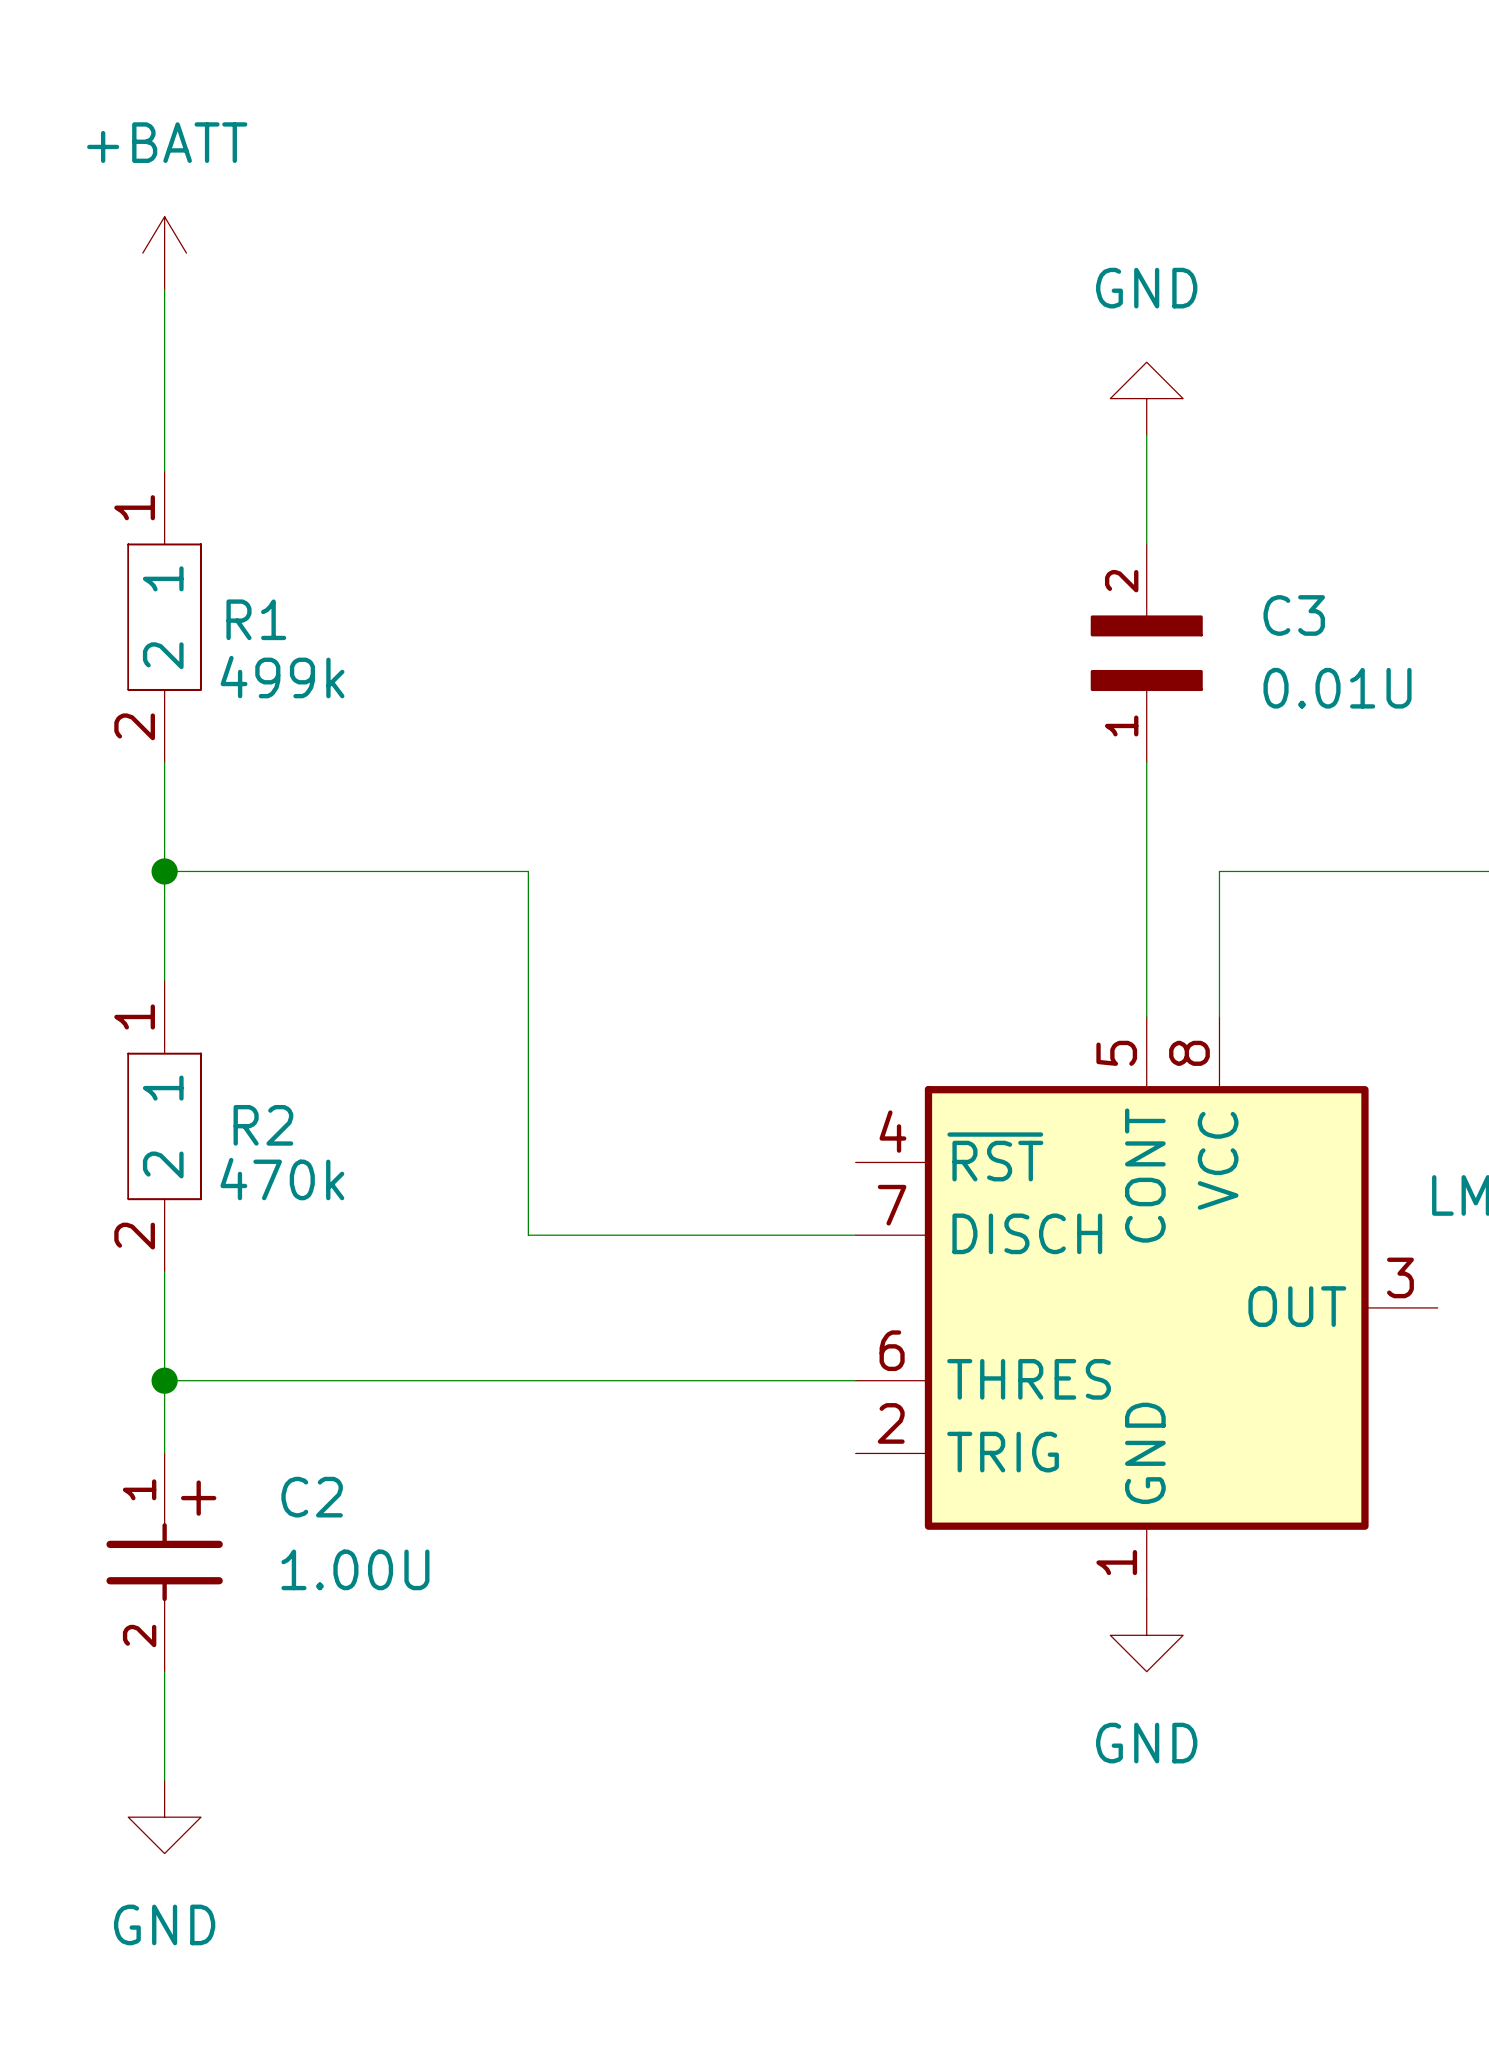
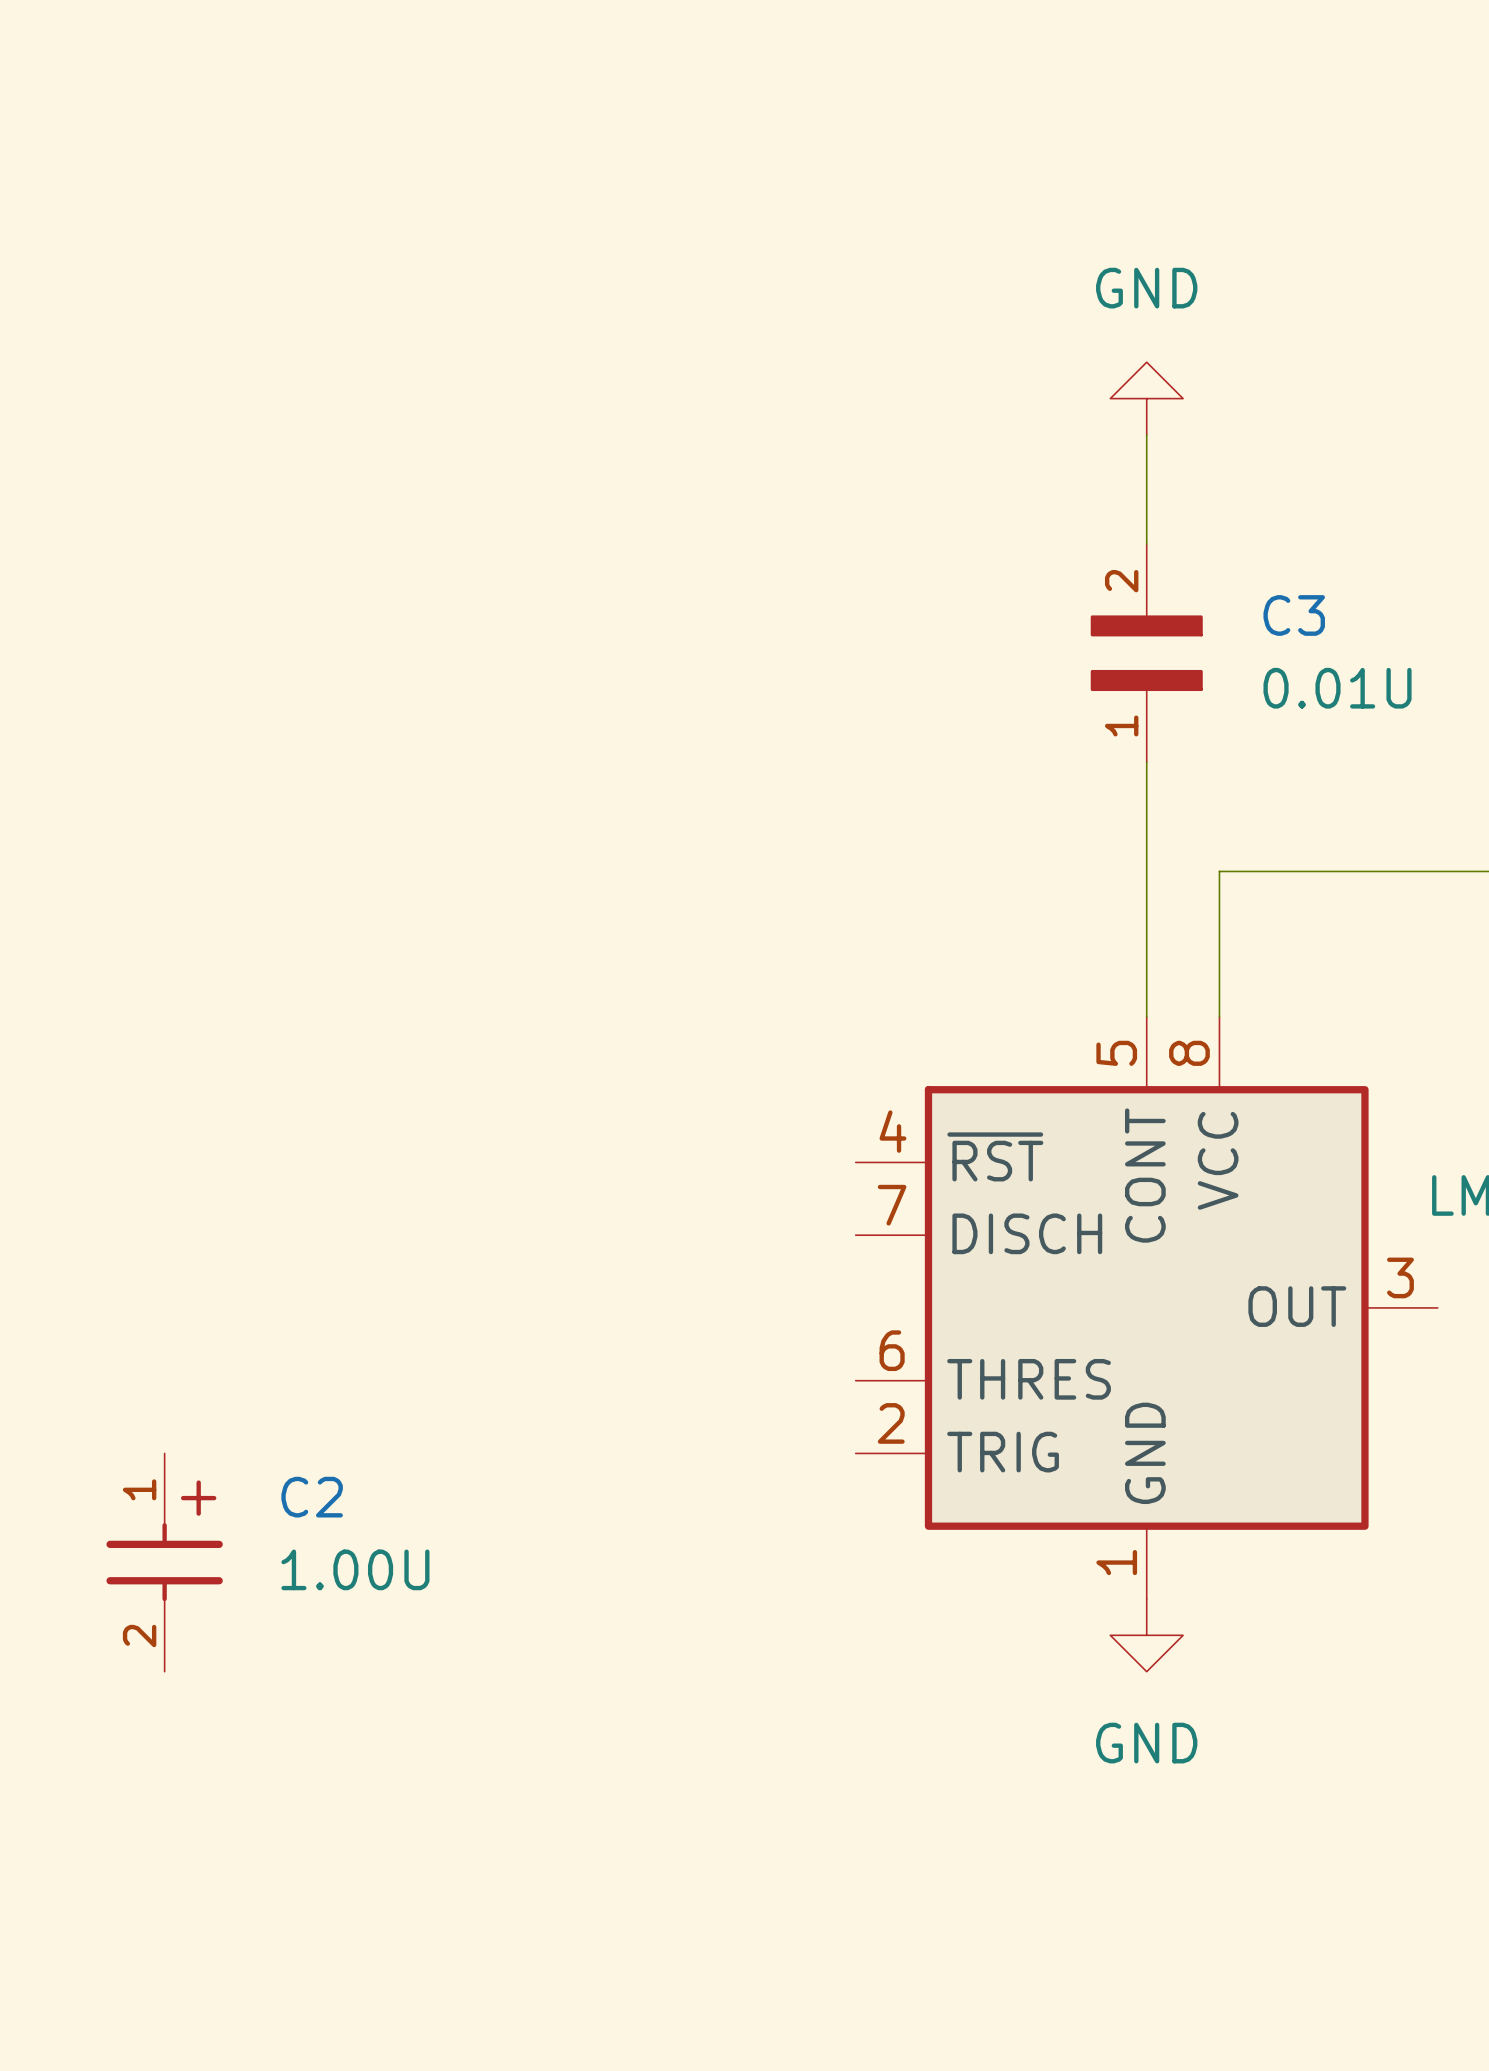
power symbol: +BATT (164, 253) -> none
wire: (164, 289) (164, 471) -> none
R1: 499k (164, 616) -> none
wire: (164, 762) (164, 980) -> none
wire: (164, 871) (528, 871) (528, 1235) (855, 1235) -> none
junction: (164, 871) -> none
R2: 470k (164, 1126) -> none
wire: (164, 1271) (164, 1453) -> none
wire: (164, 1380) (855, 1380) -> none
junction: (164, 1380) -> none
wire: (164, 1671) (164, 1780) -> none
power symbol: GND (164, 1817) -> none

